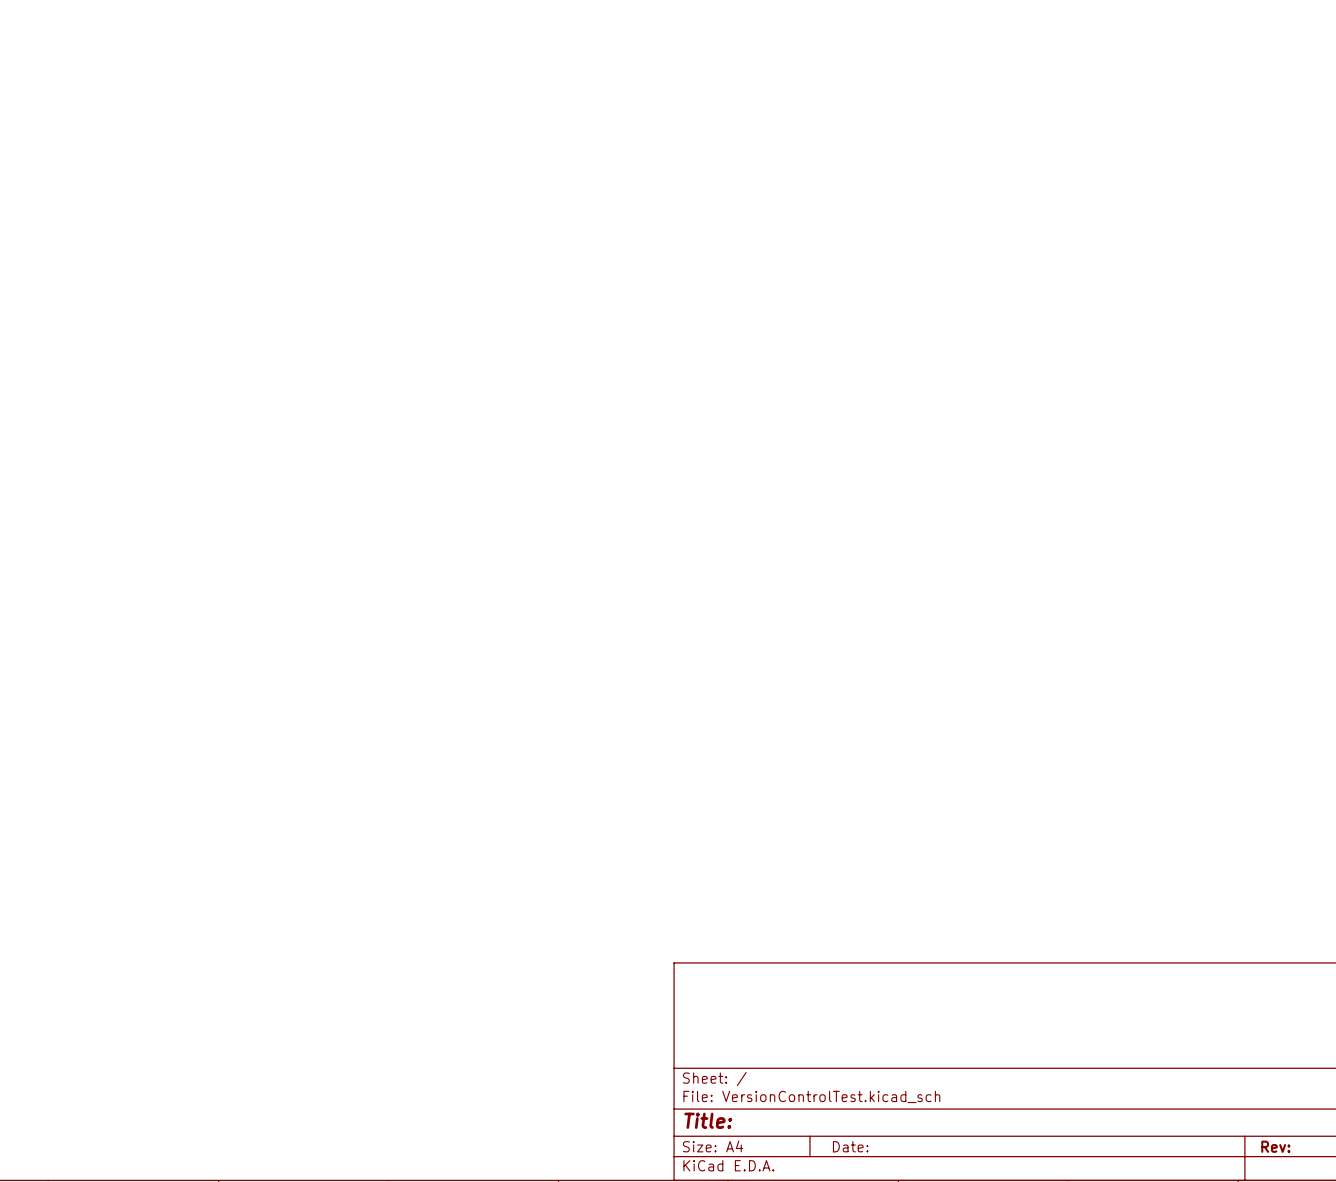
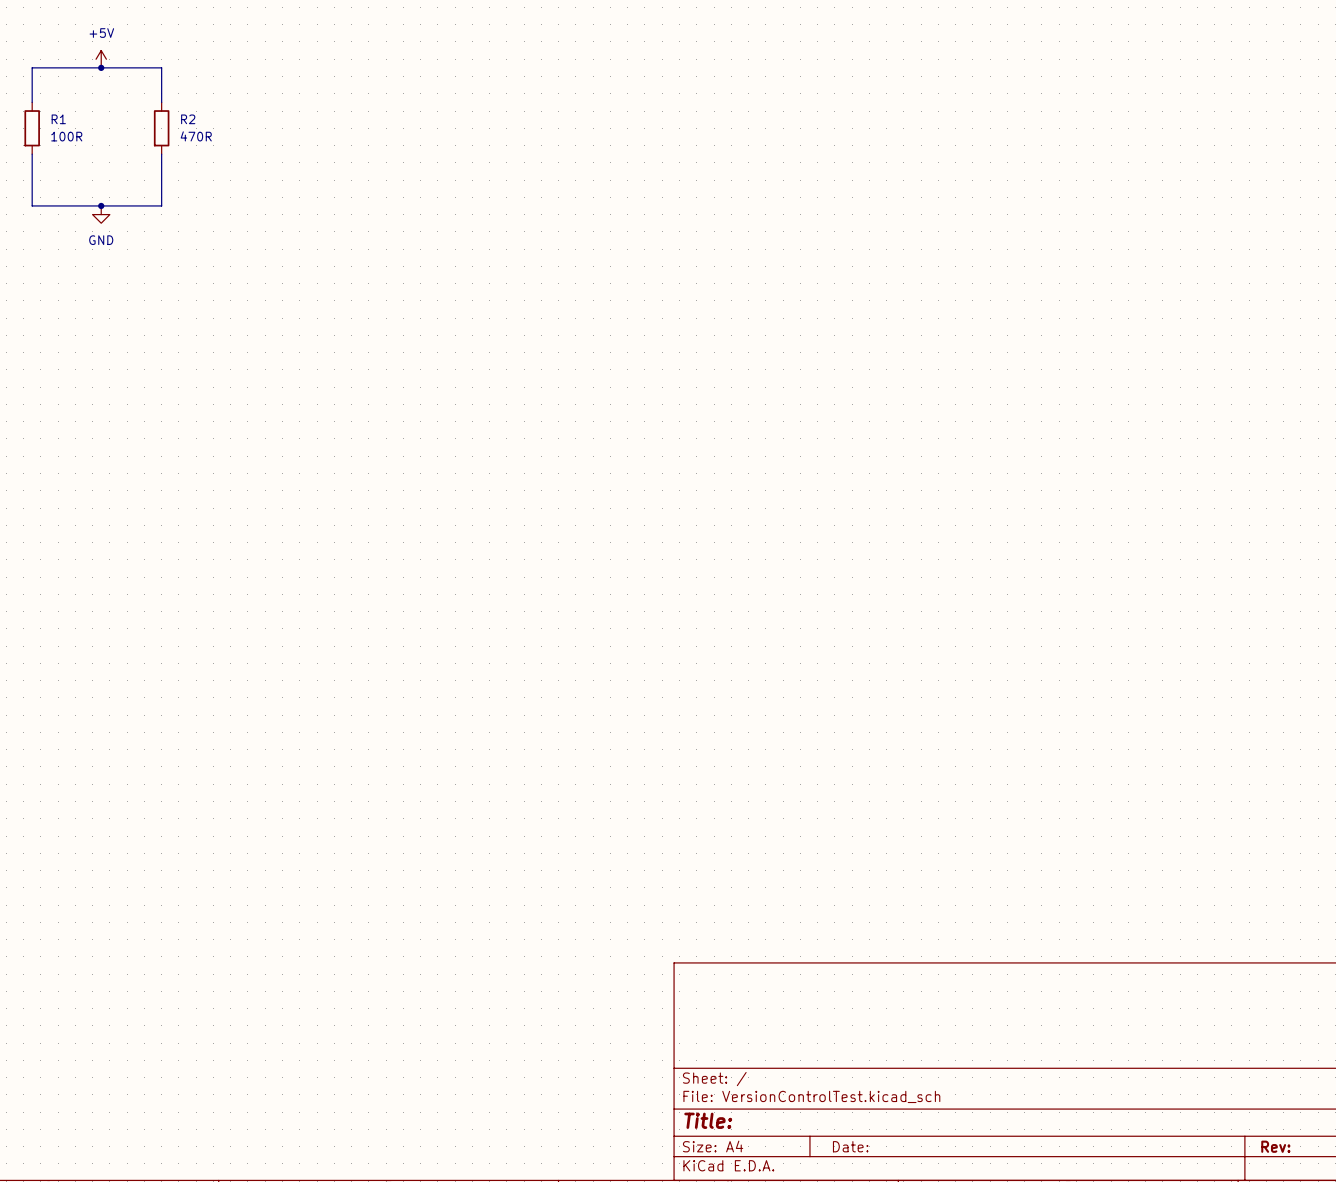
power symbol: none -> +5V (101, 59)
junction: none -> (101, 67)
wire: none -> (32, 102) (32, 67) (161, 67) (161, 102)
R1: none -> 100R (32, 128)
R2: none -> 470R (161, 128)
wire: none -> (32, 154) (32, 205) (161, 205) (161, 154)
junction: none -> (101, 205)
power symbol: none -> GND (101, 214)

